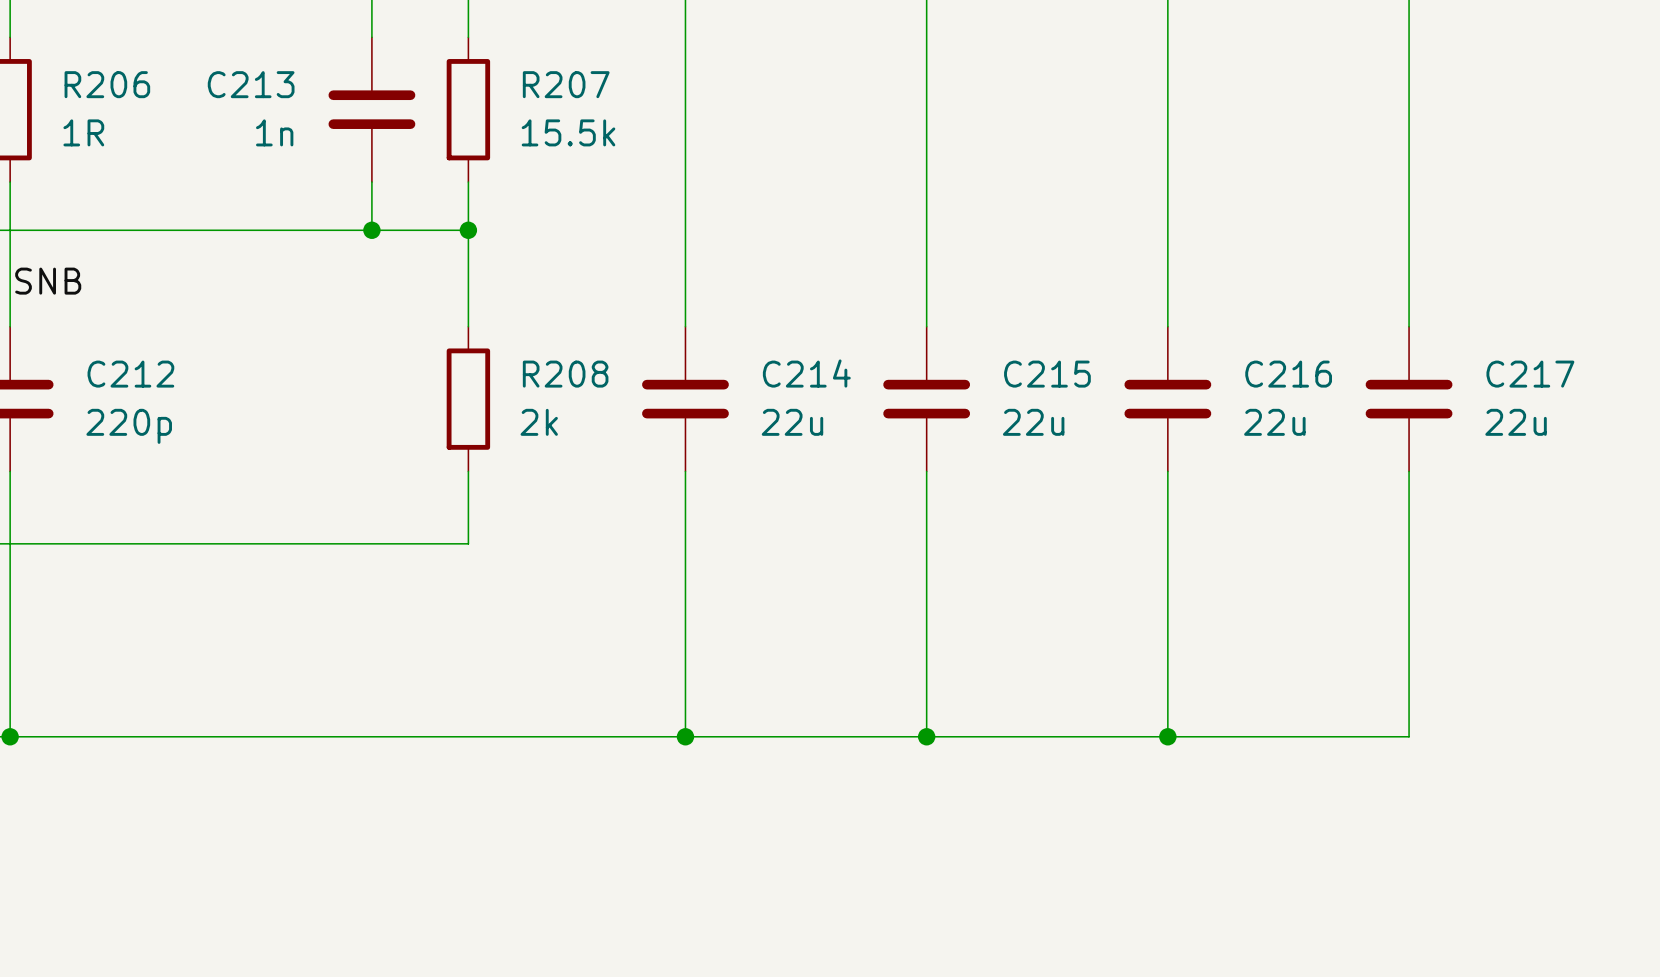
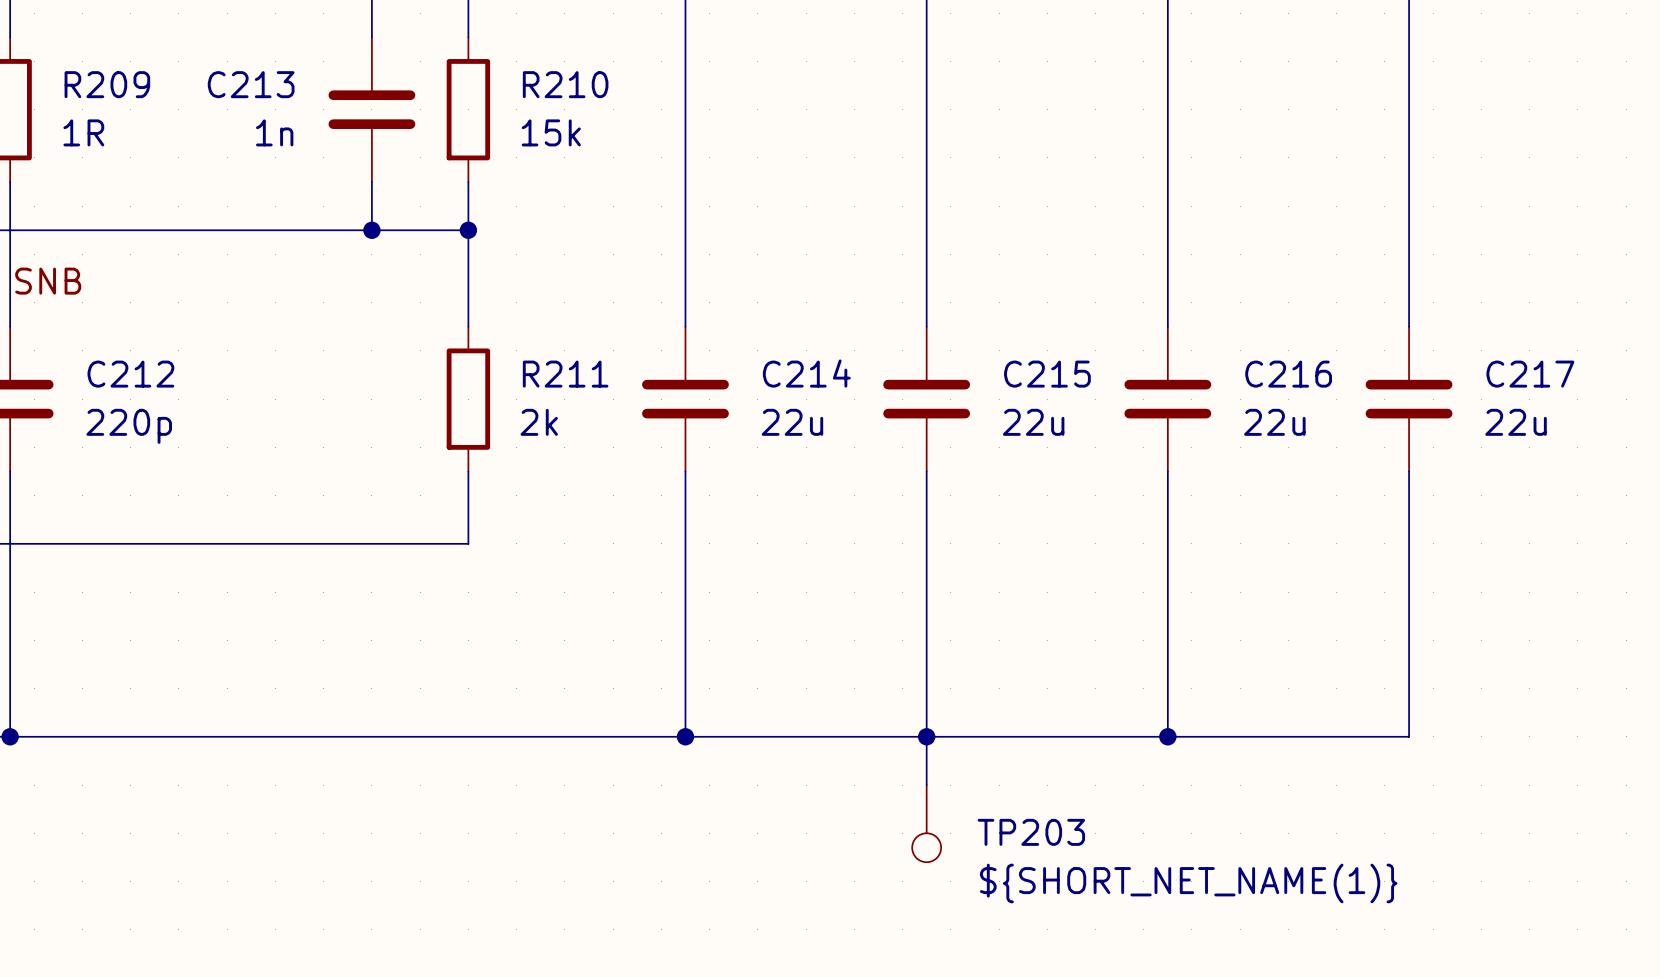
R206 name: R206 (107, 84) -> R209 (107, 84)
R207 name: R207 (566, 84) -> R210 (565, 84)
R207 value: 15.5k (568, 132) -> 15k (551, 132)
R208 name: R208 (565, 374) -> R211 (565, 374)
wire: none -> (926, 736) (926, 785)
TP203: none -> ${SHORT_NET_NAME(1)} (926, 823)

